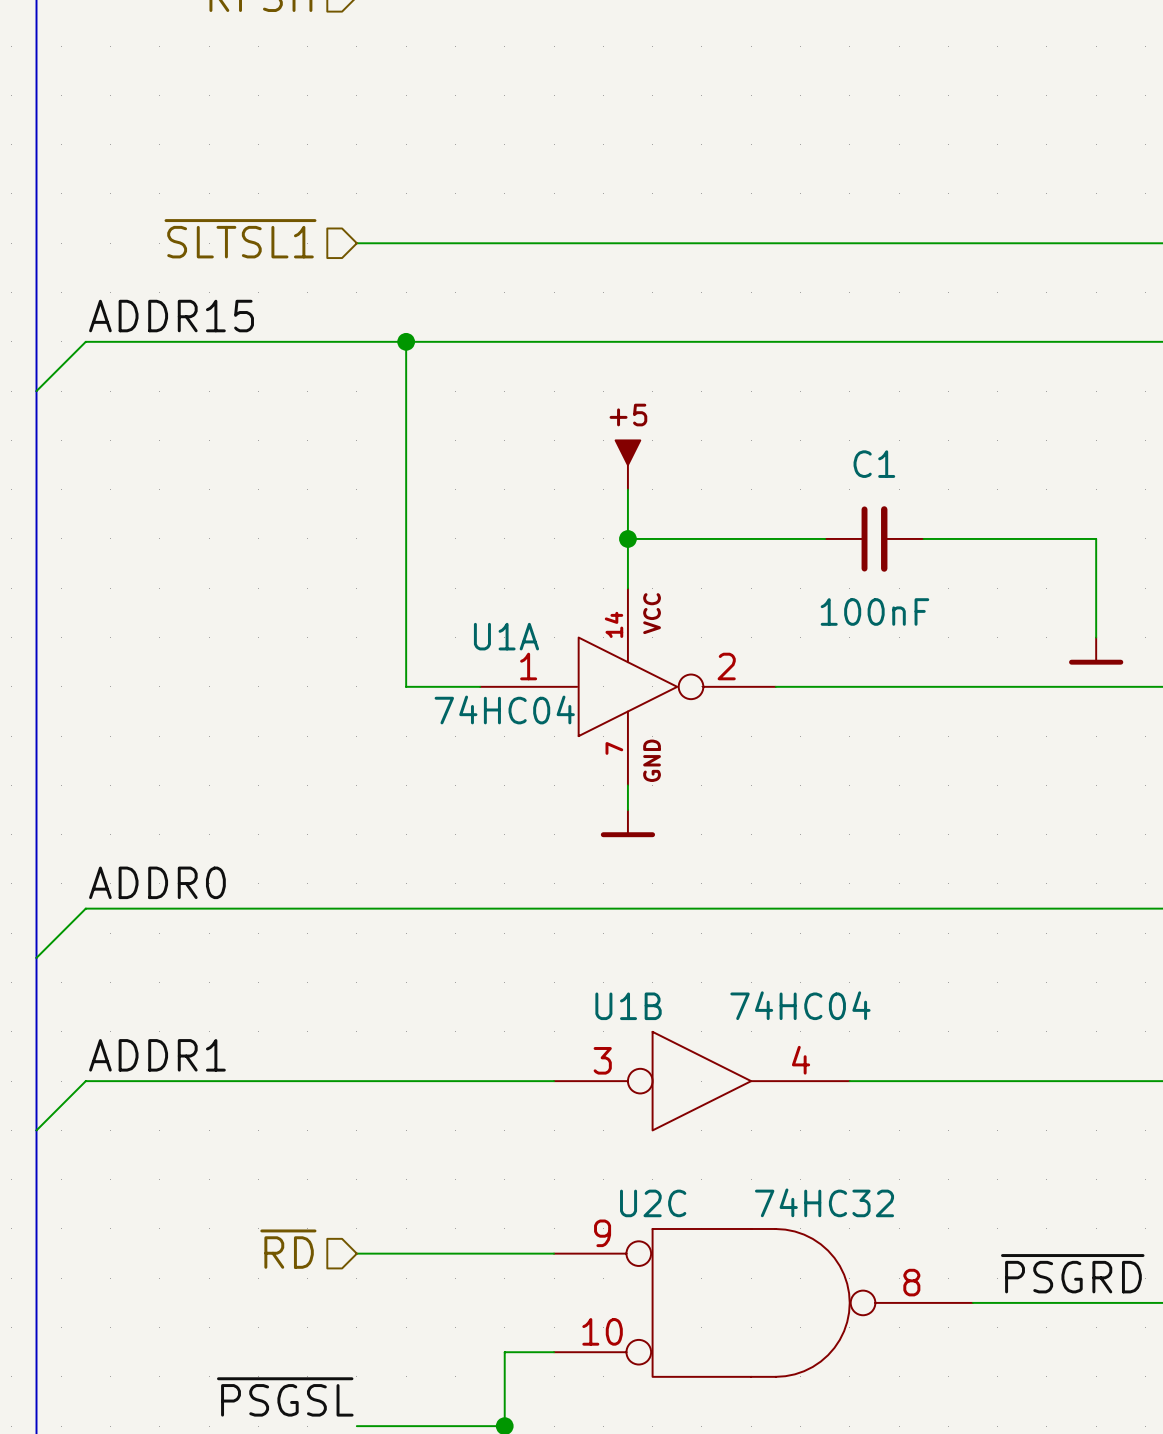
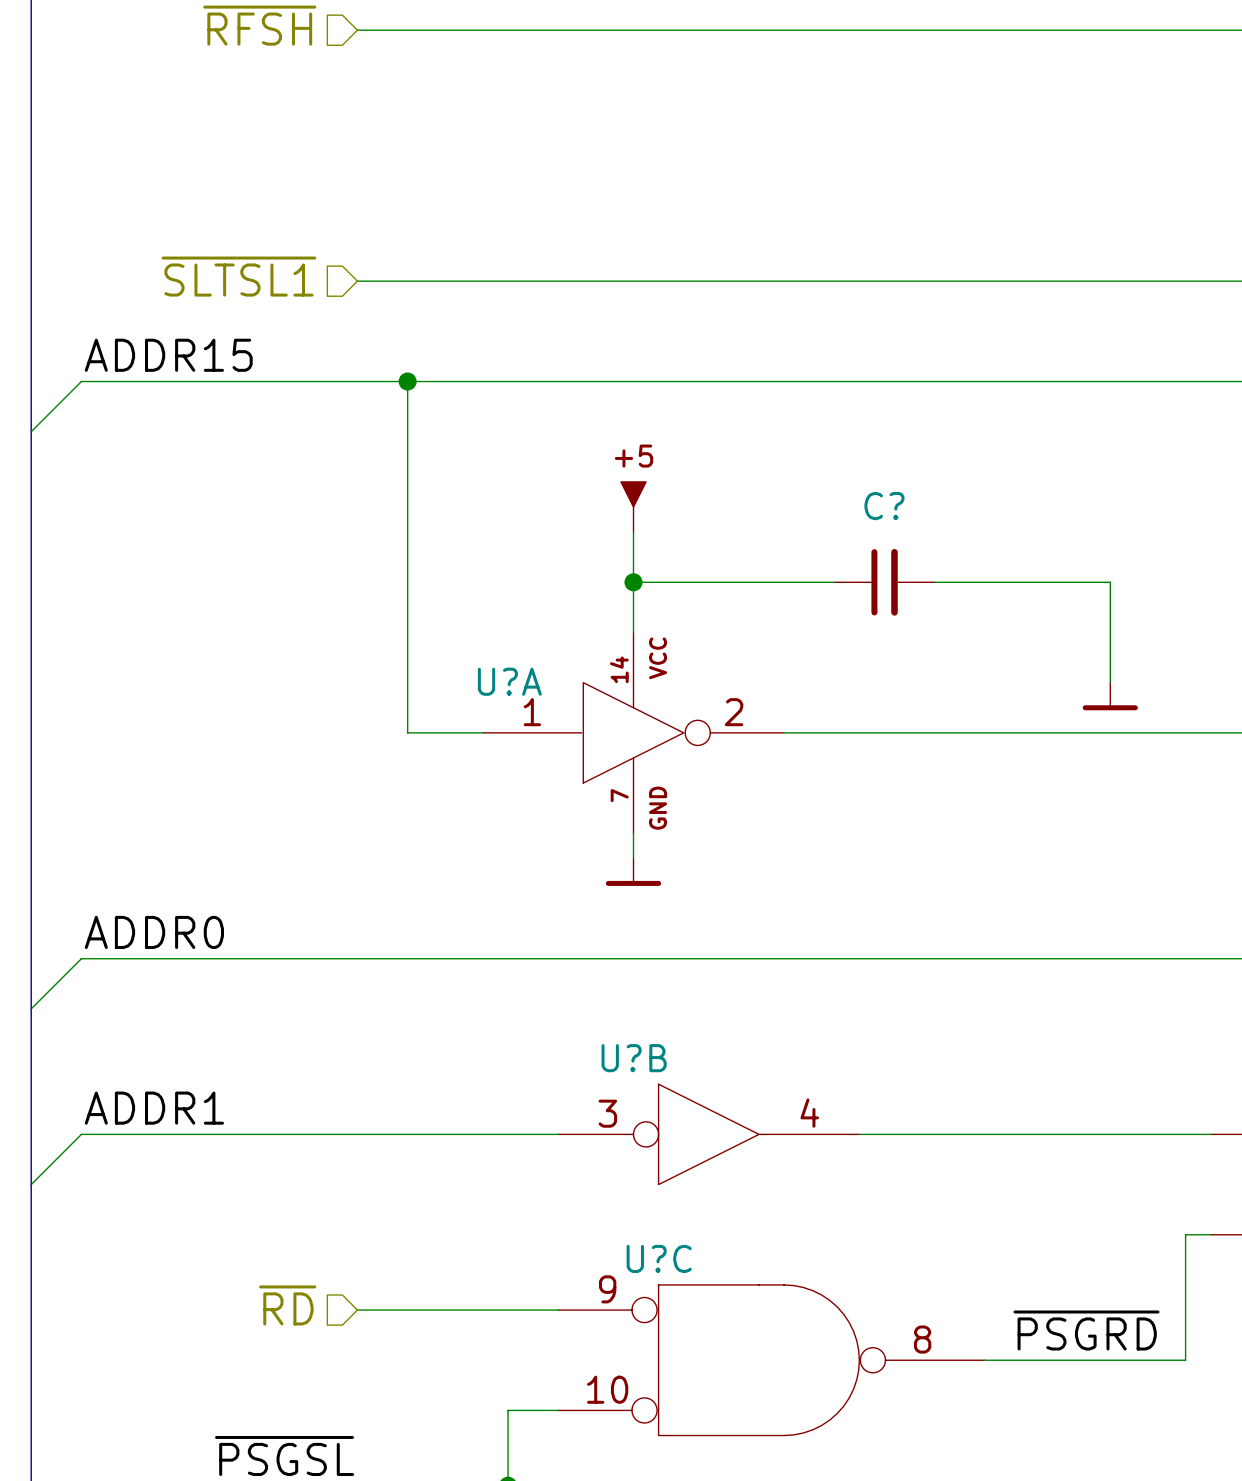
C1 name: C1 (874, 464) -> C? (884, 506)
C1 value: 100nF (874, 611) -> none
U1A name: U1A (506, 636) -> U?A (509, 681)
U1A value: 74HC04 (504, 709) -> none
U1B value: 74HC04 (800, 1005) -> none
U1B name: U1B (628, 1006) -> U?B (634, 1058)
U2C value: 74HC32 (824, 1202) -> none
U2C name: U2C (653, 1203) -> U?C (659, 1258)

